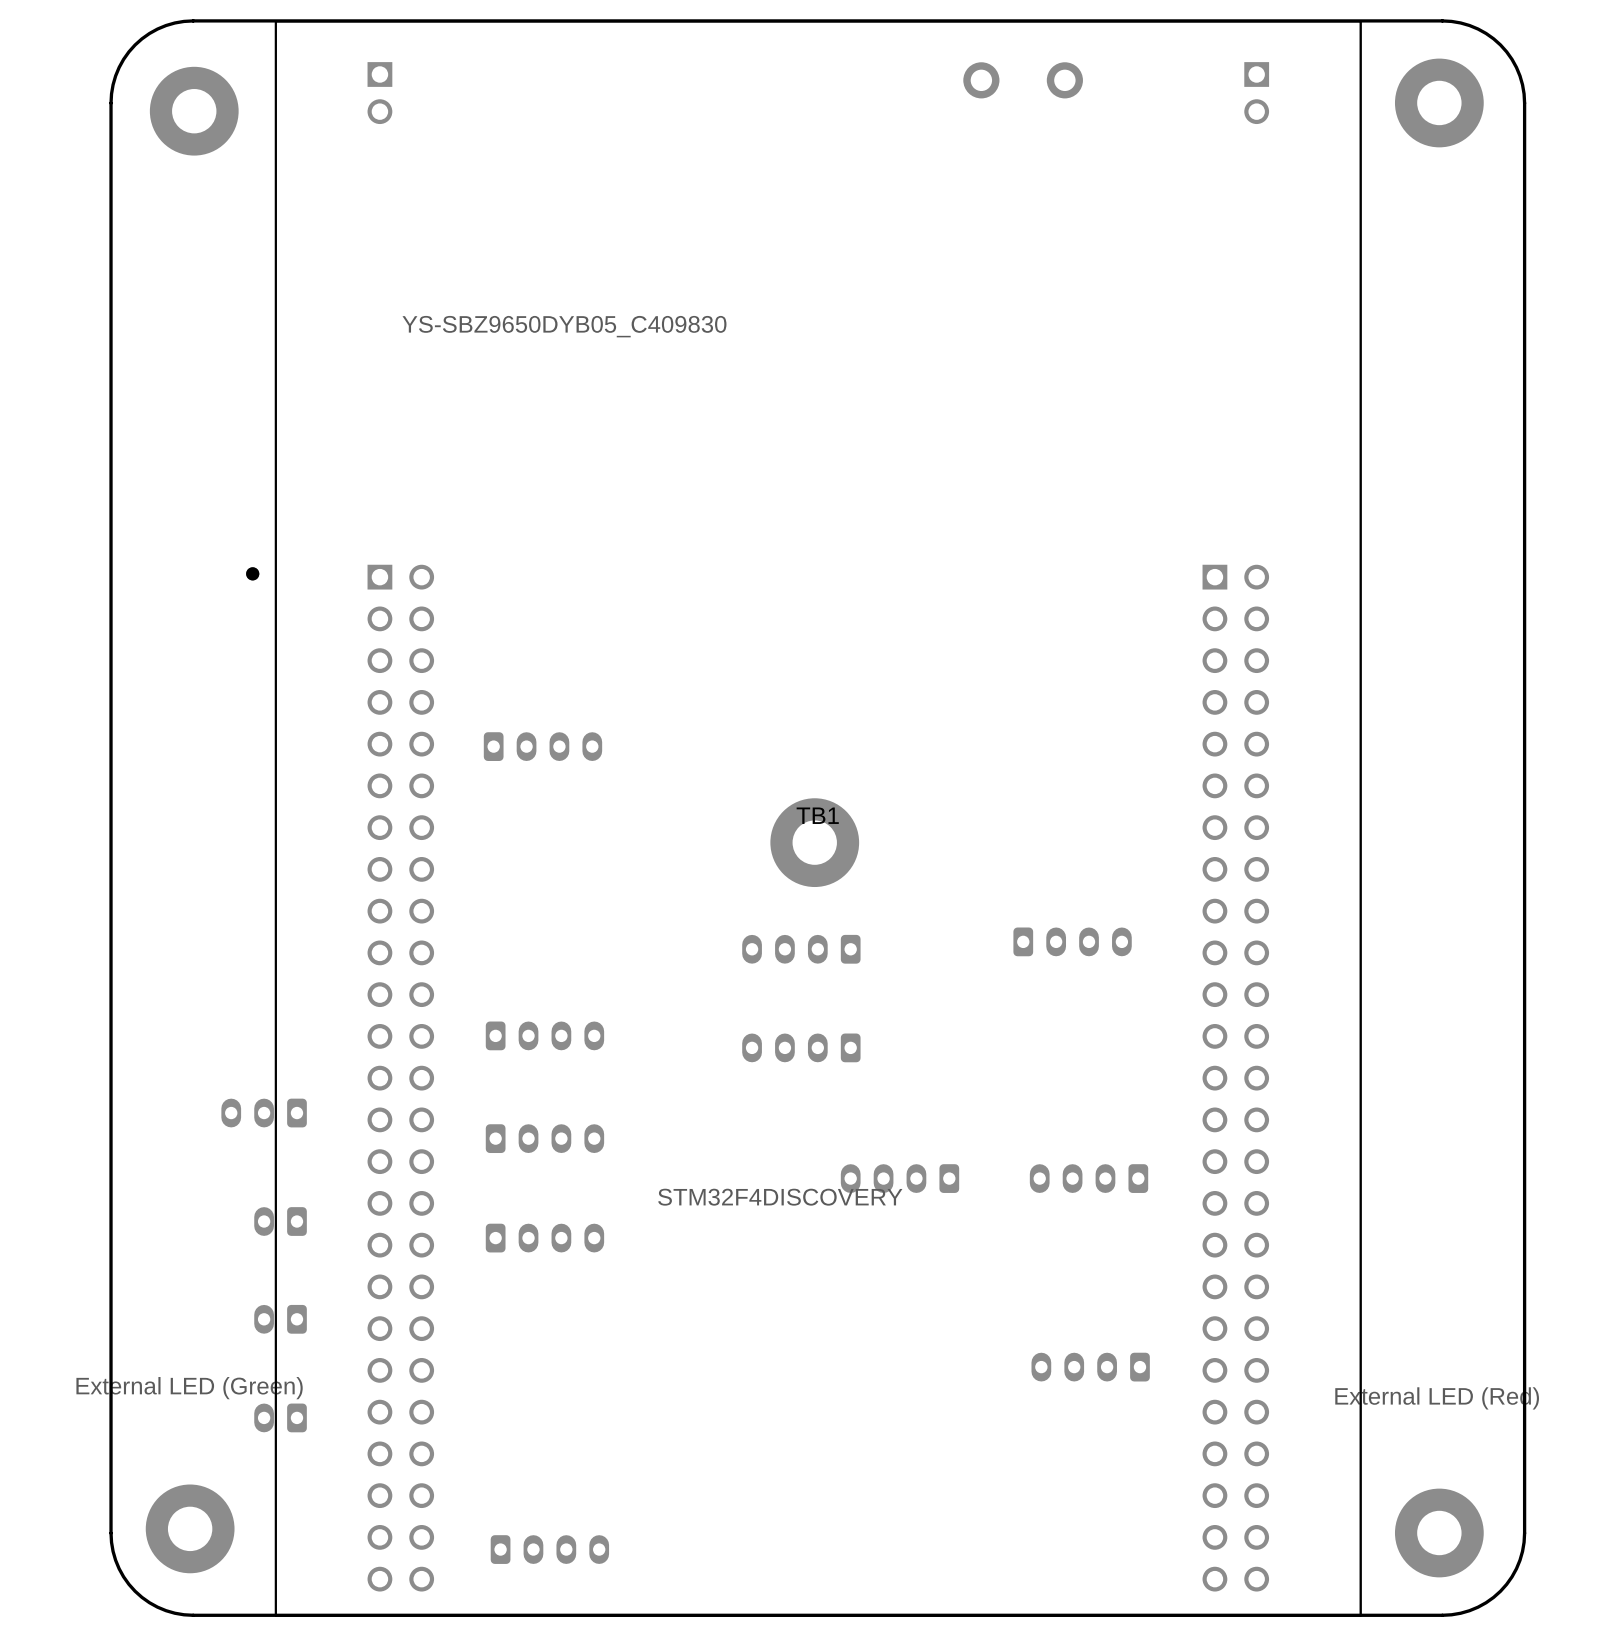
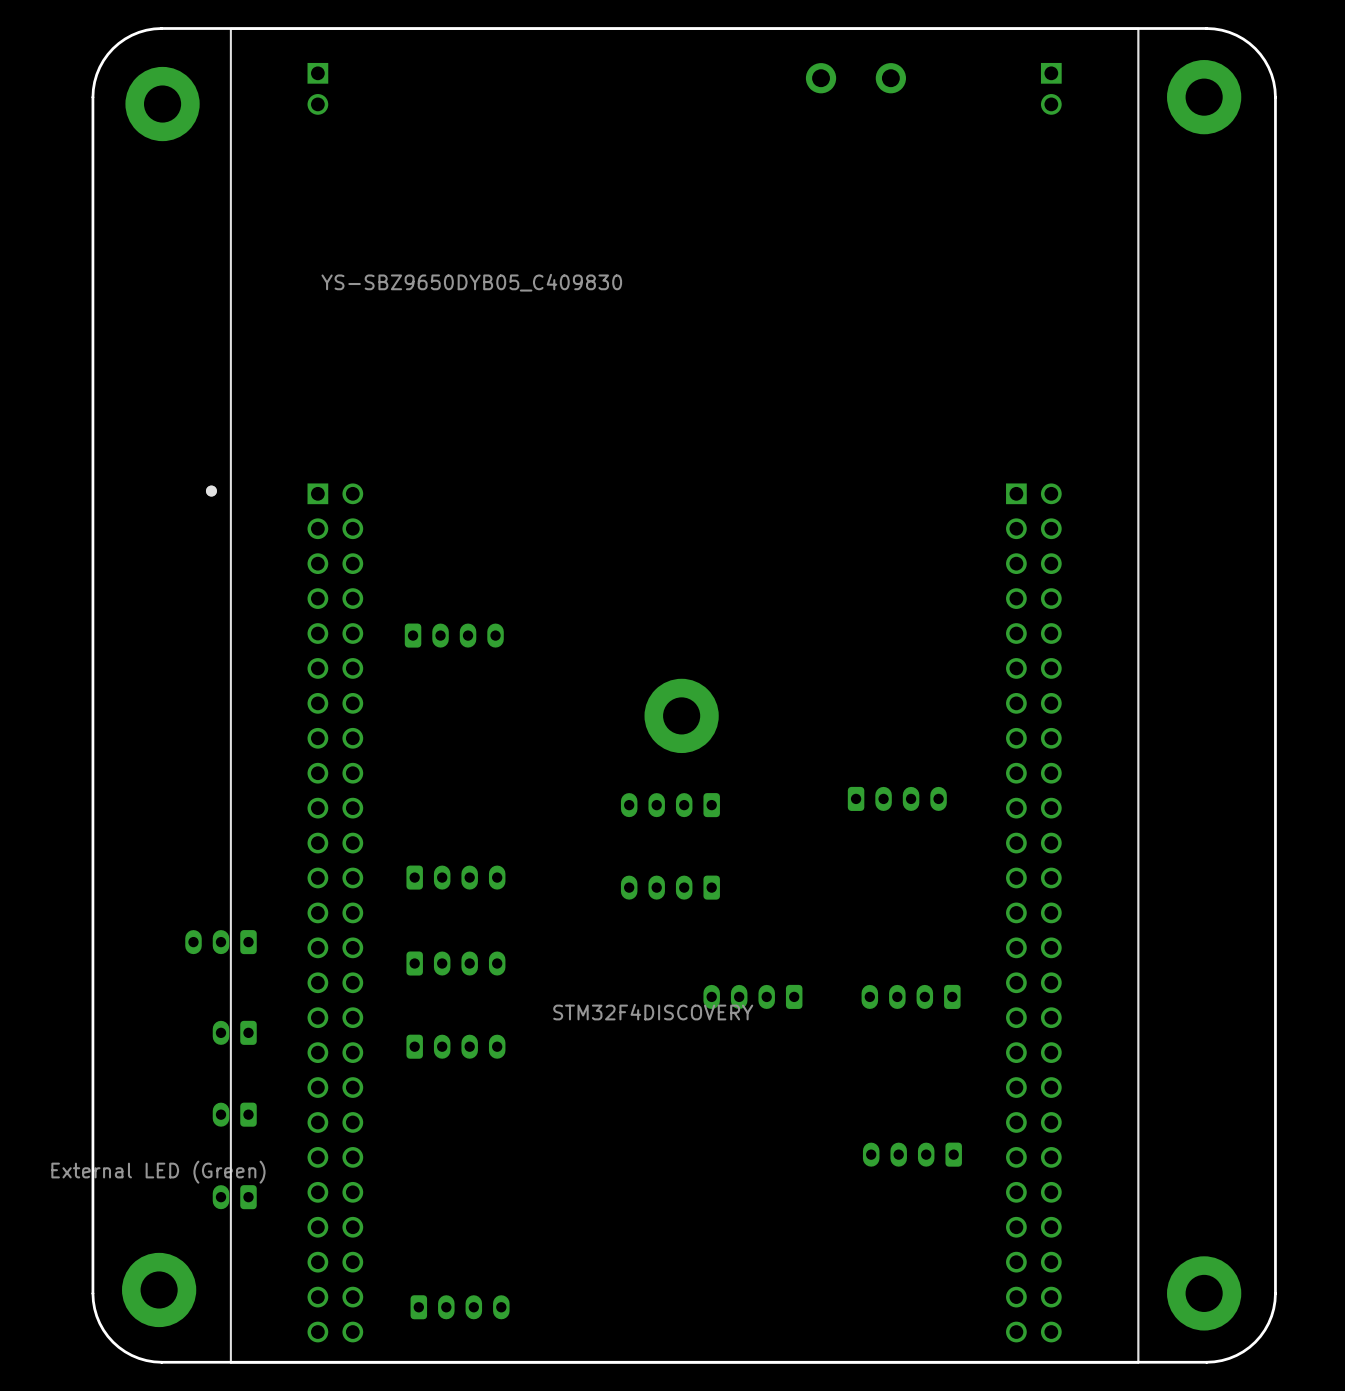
TB1 name: TB1 (817, 815) -> none
part value: External LED (Red) (1437, 1398) -> none

